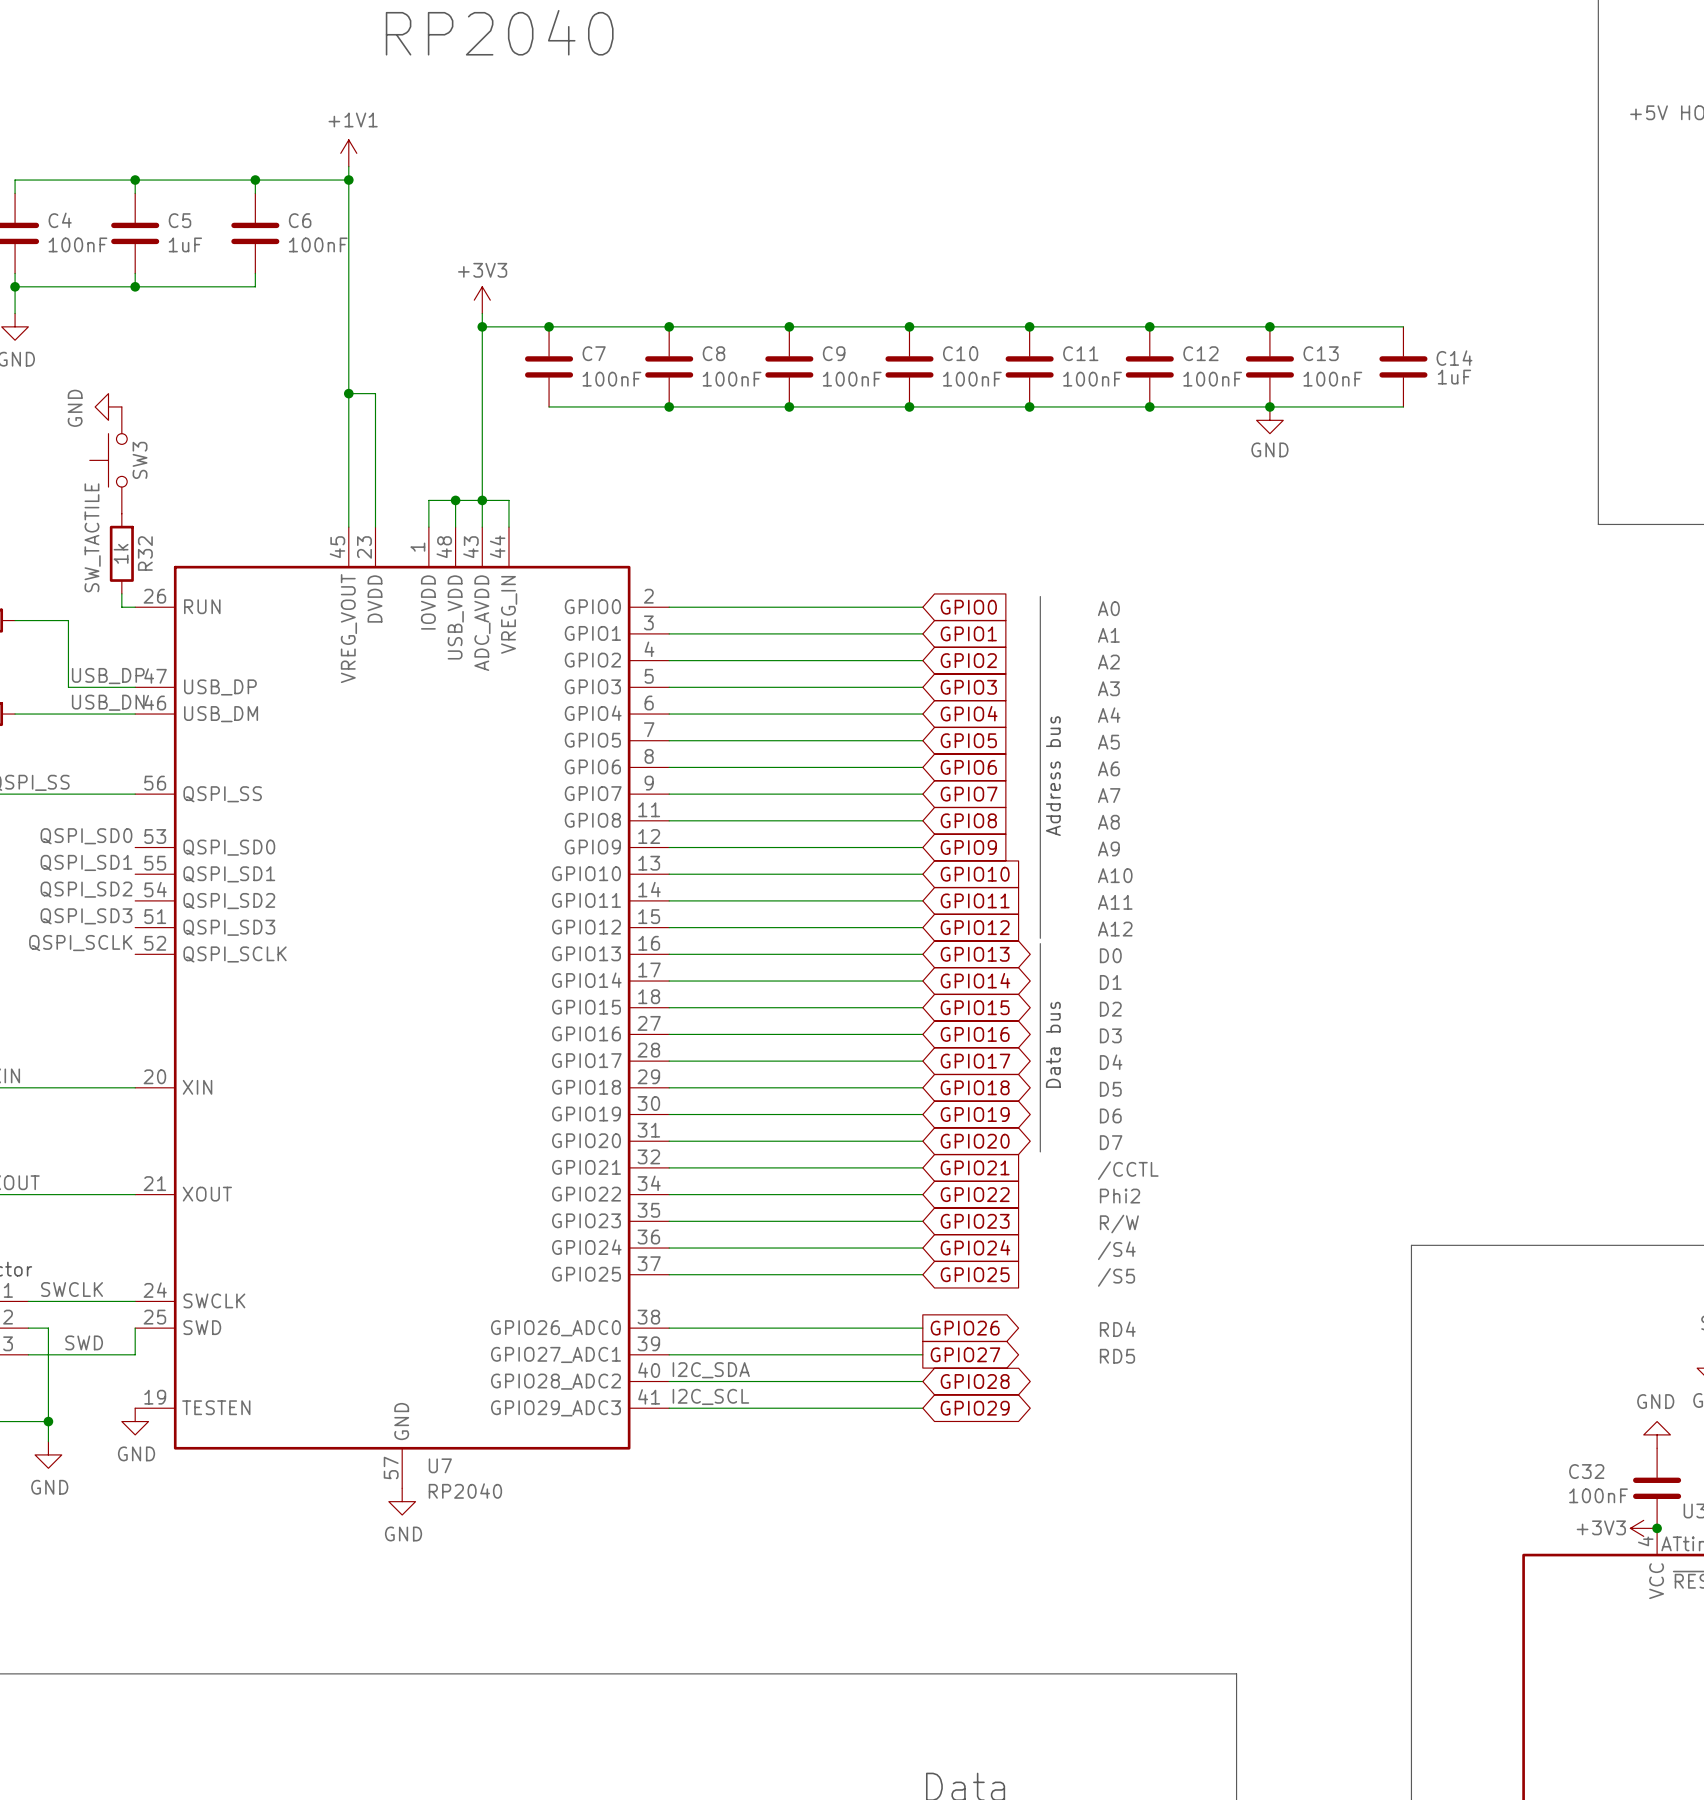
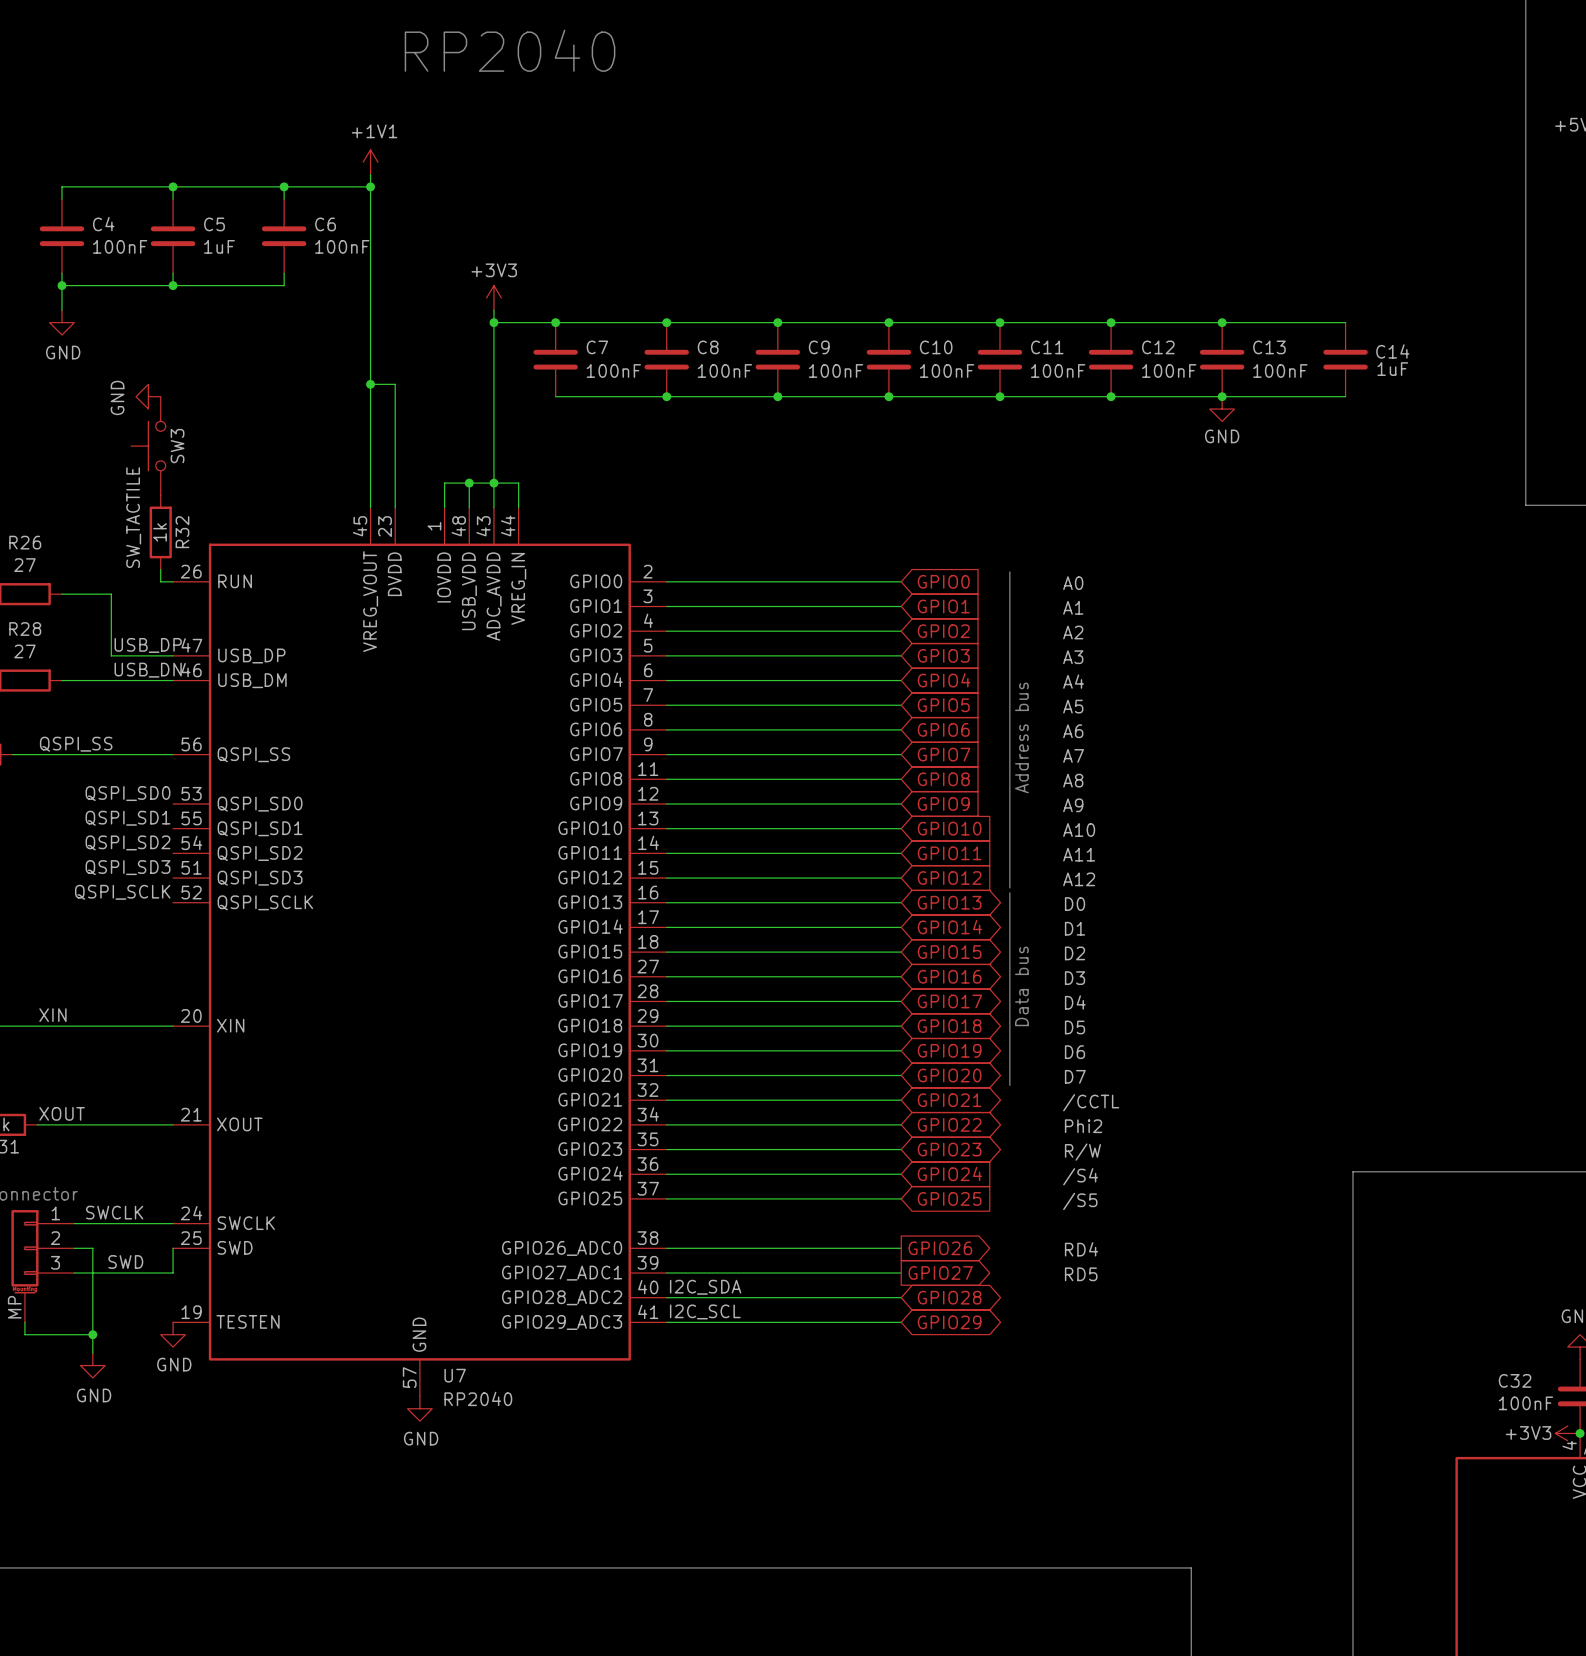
global label shape: input (975, 1167) -> bidirectional (949, 1100)
global label shape: input (975, 1194) -> bidirectional (949, 1124)
global label shape: input (975, 1221) -> bidirectional (949, 1149)

